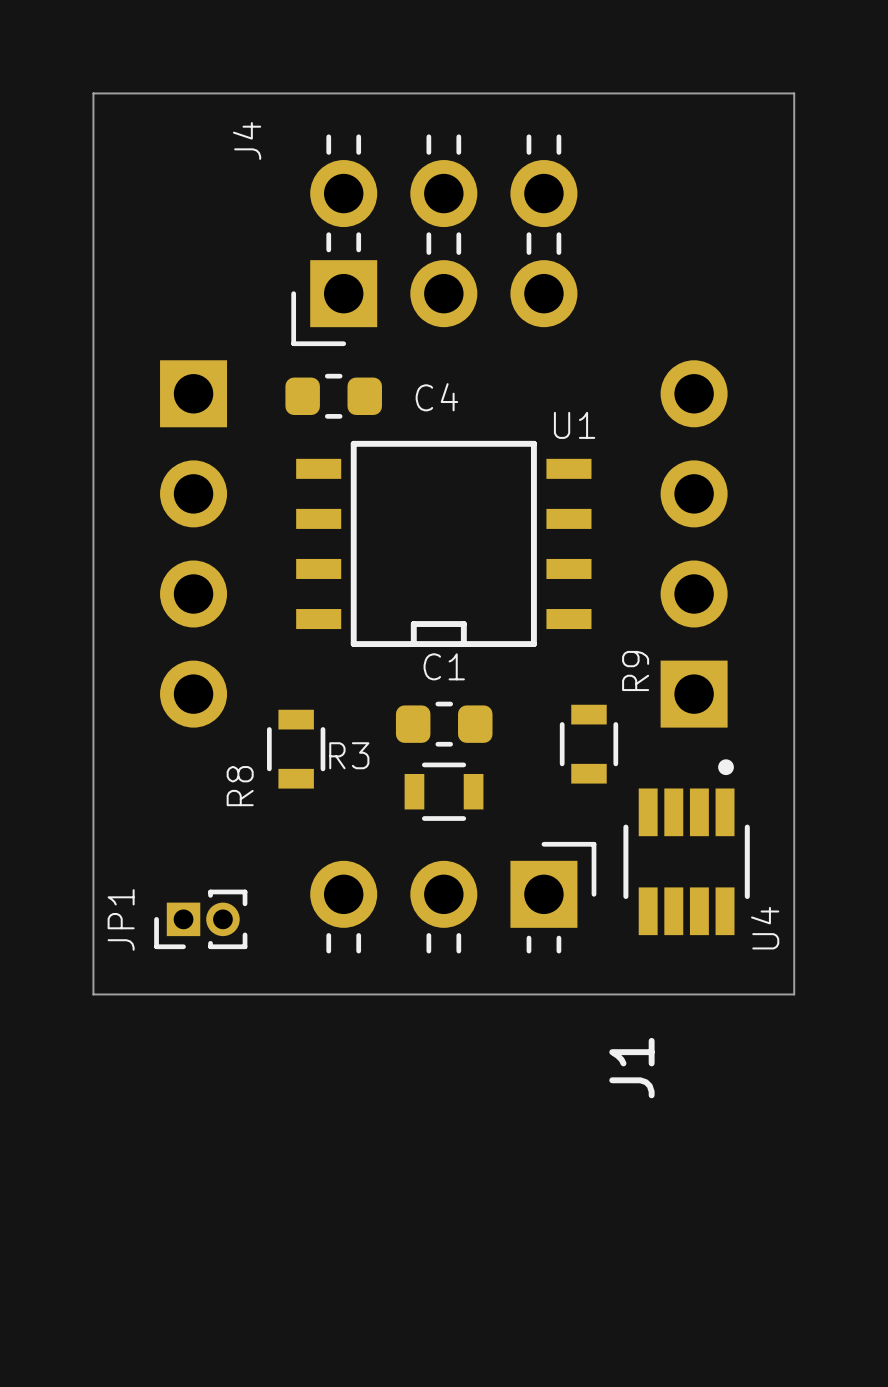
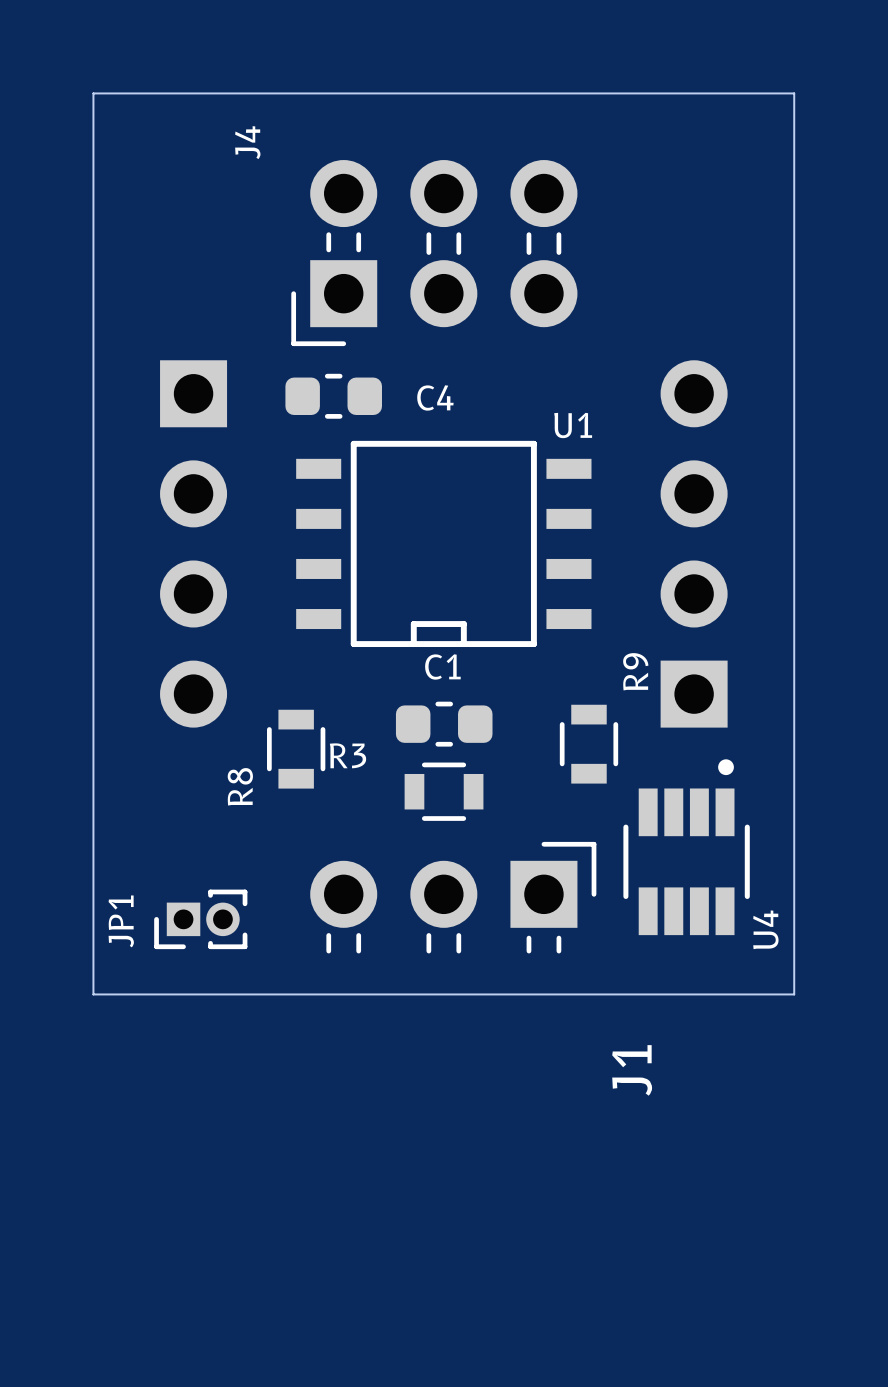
J4 footprint: [291, 134, 578, 347] -> [291, 160, 578, 347]

